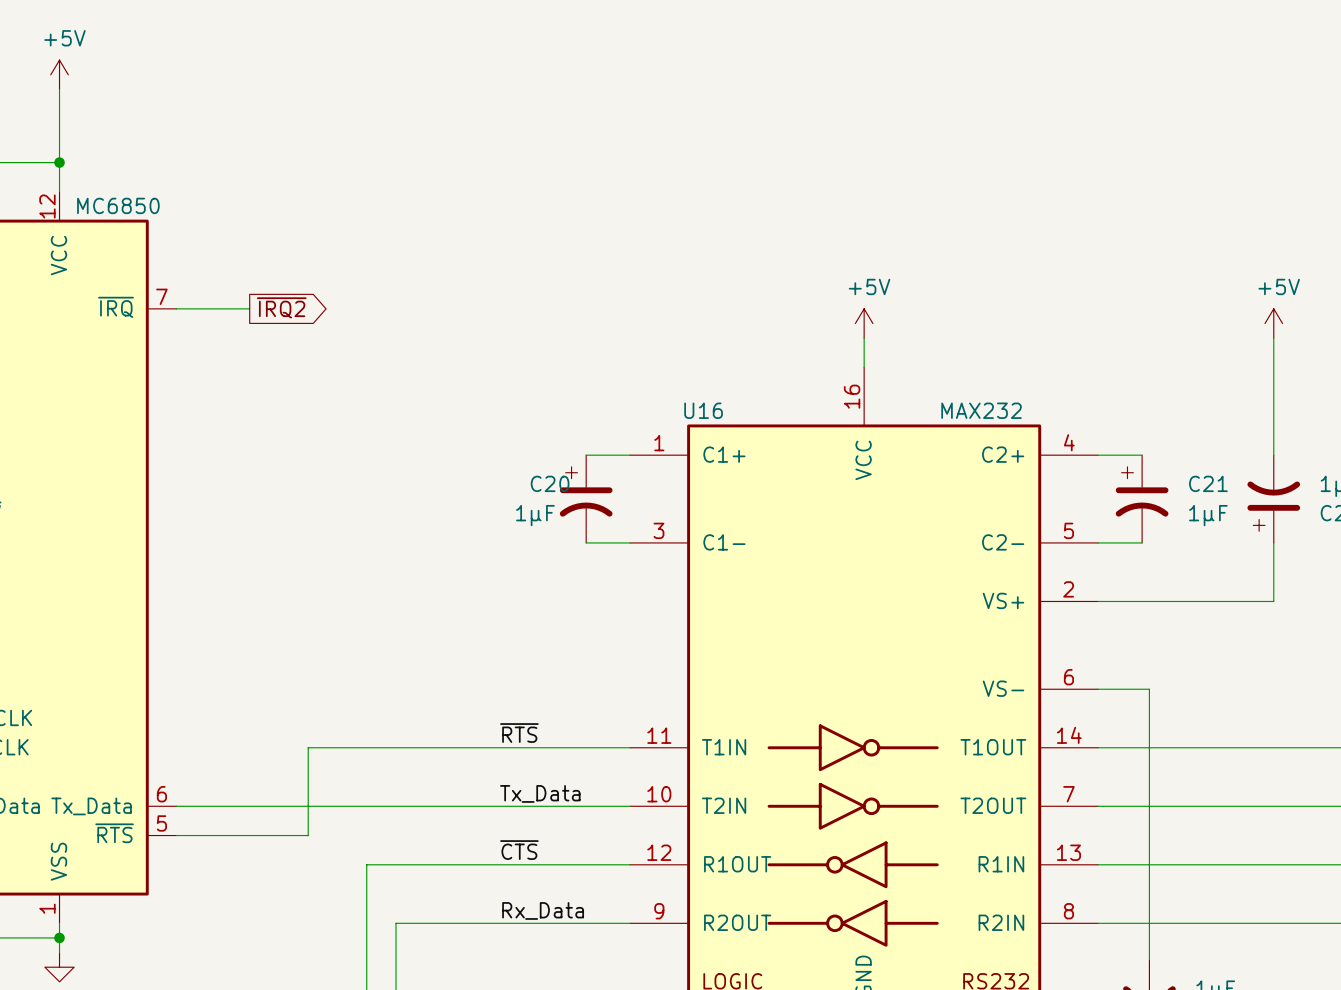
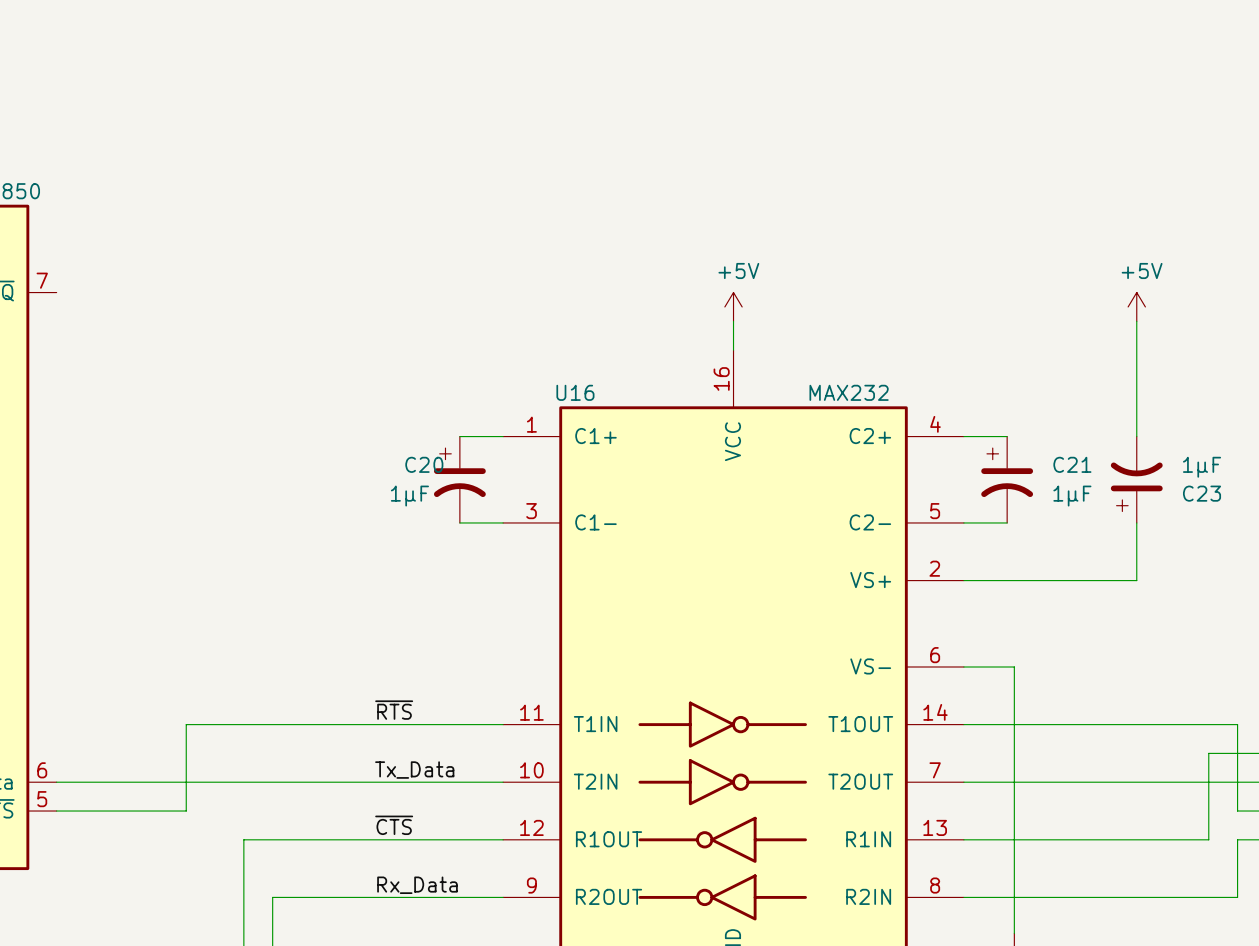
global label: ~{IRQ2} (281, 307) -> none
wire: (176, 308) (249, 308) -> none

